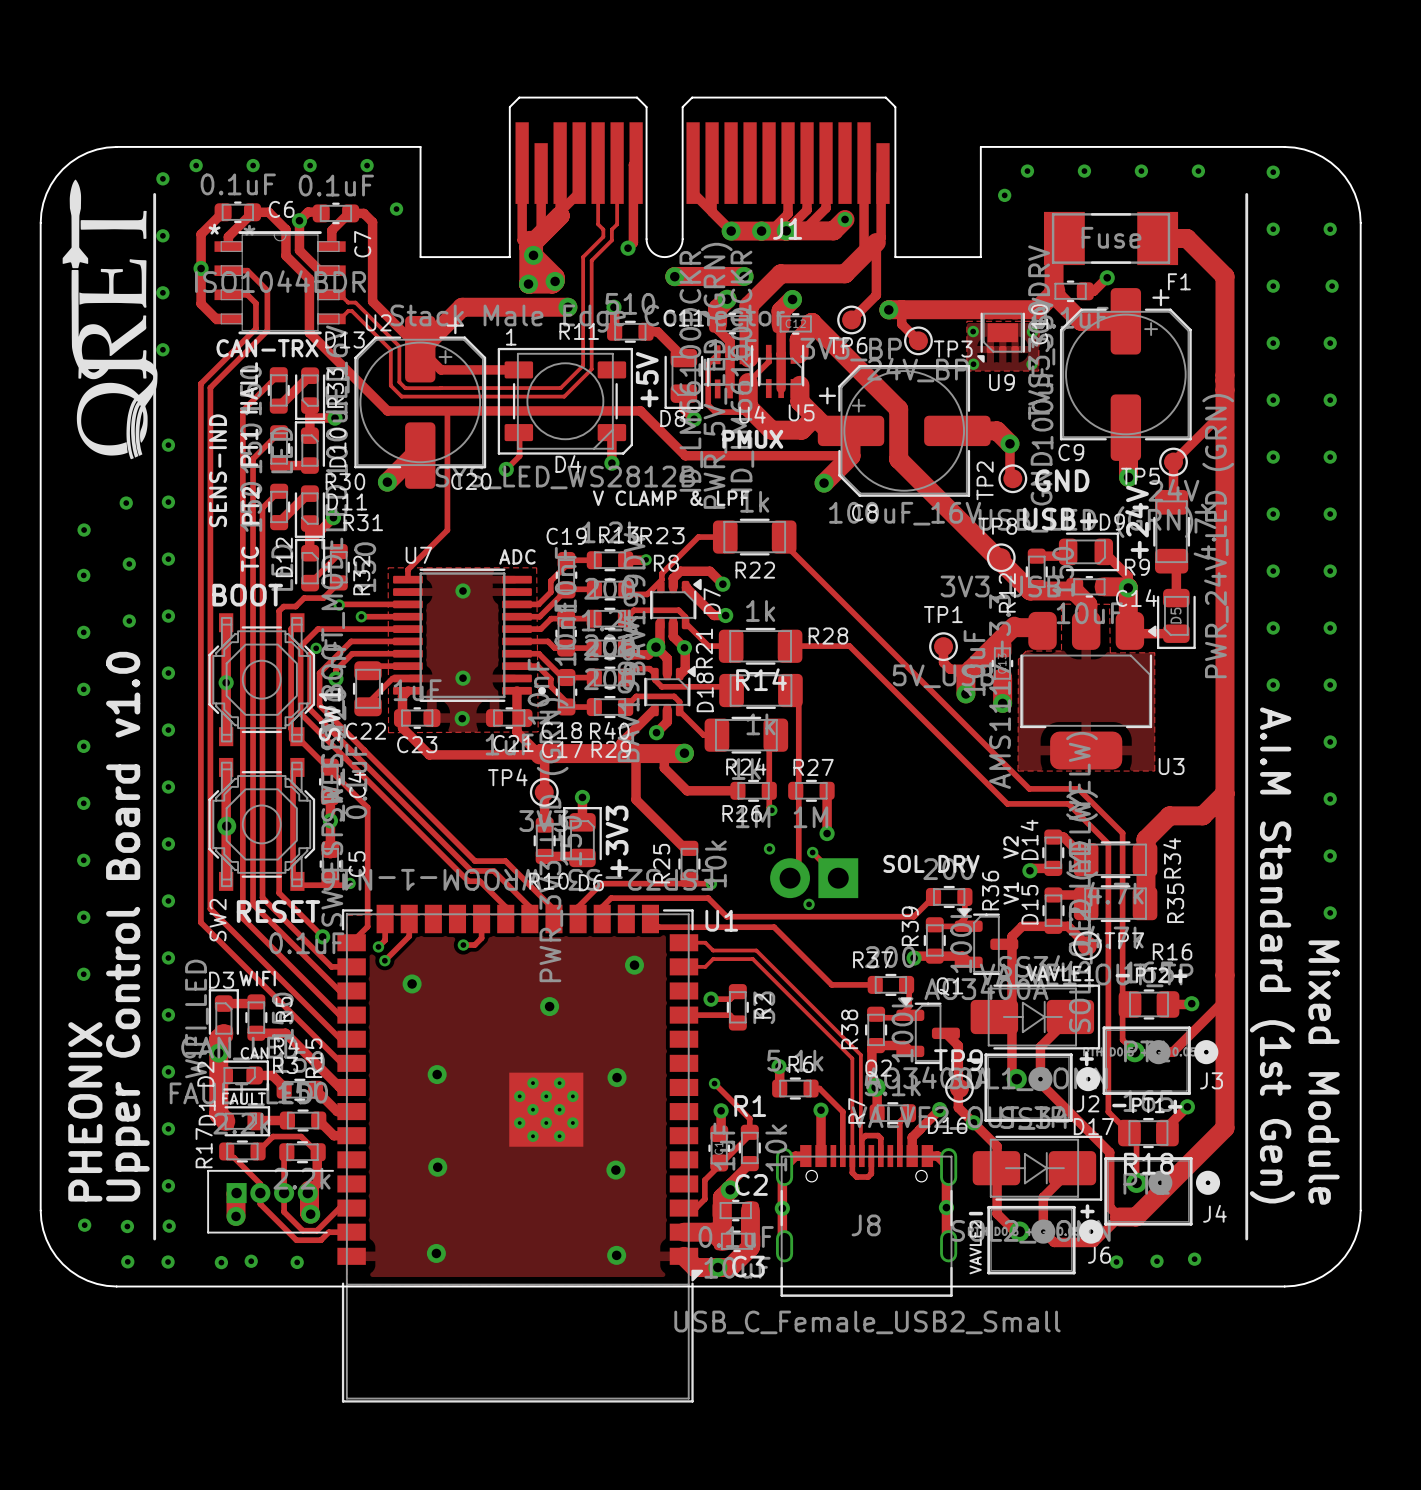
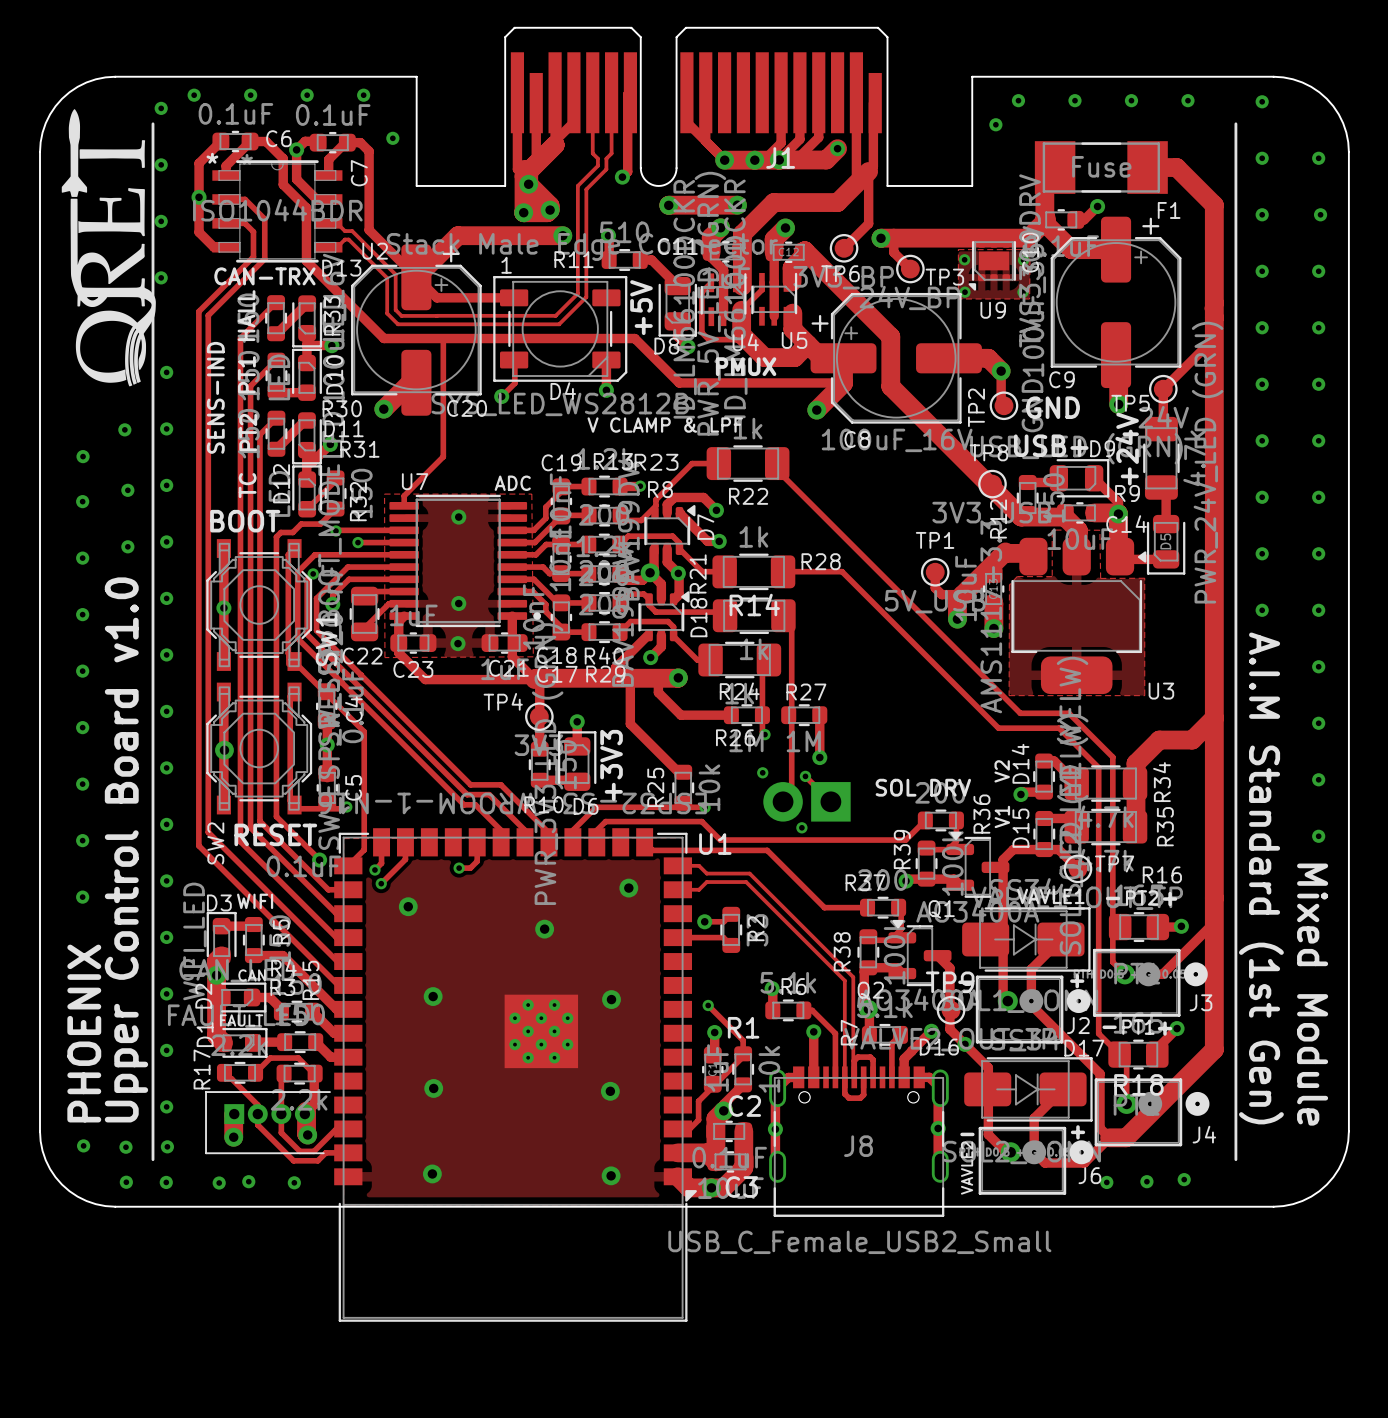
text: PHEONIX (85, 1111) -> PHOENIX (84, 1033)

